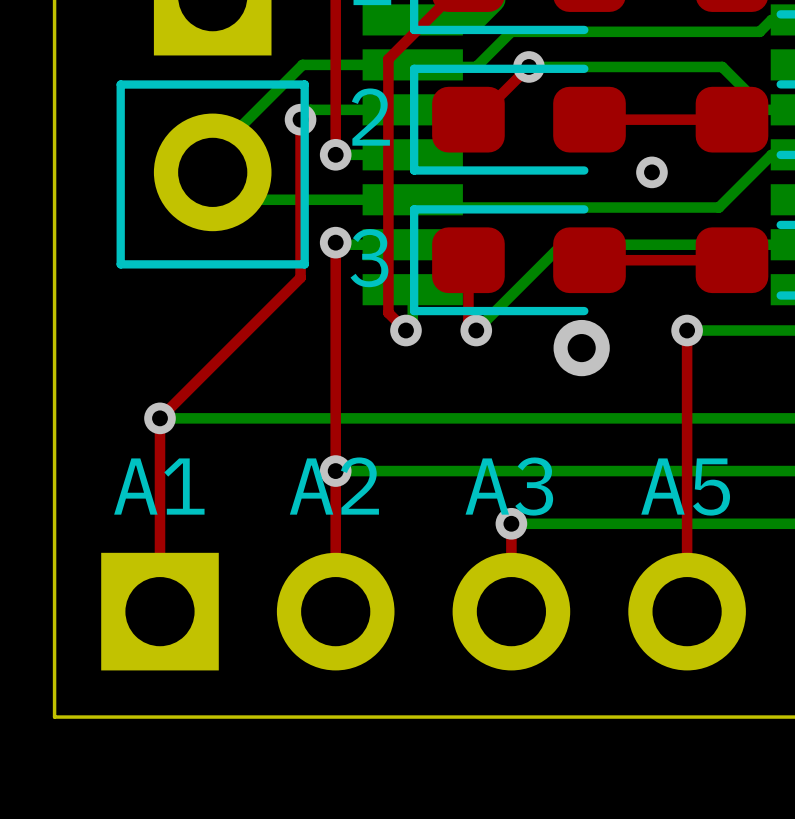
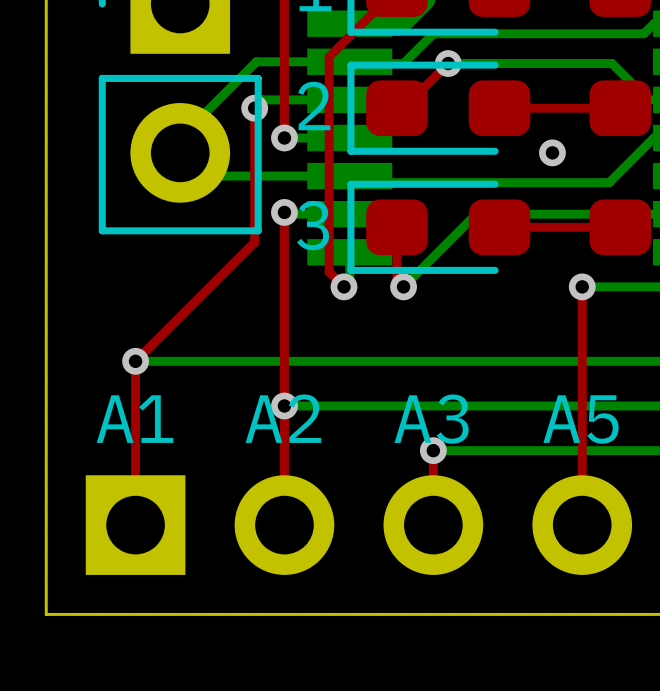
via: (581, 348) -> none

